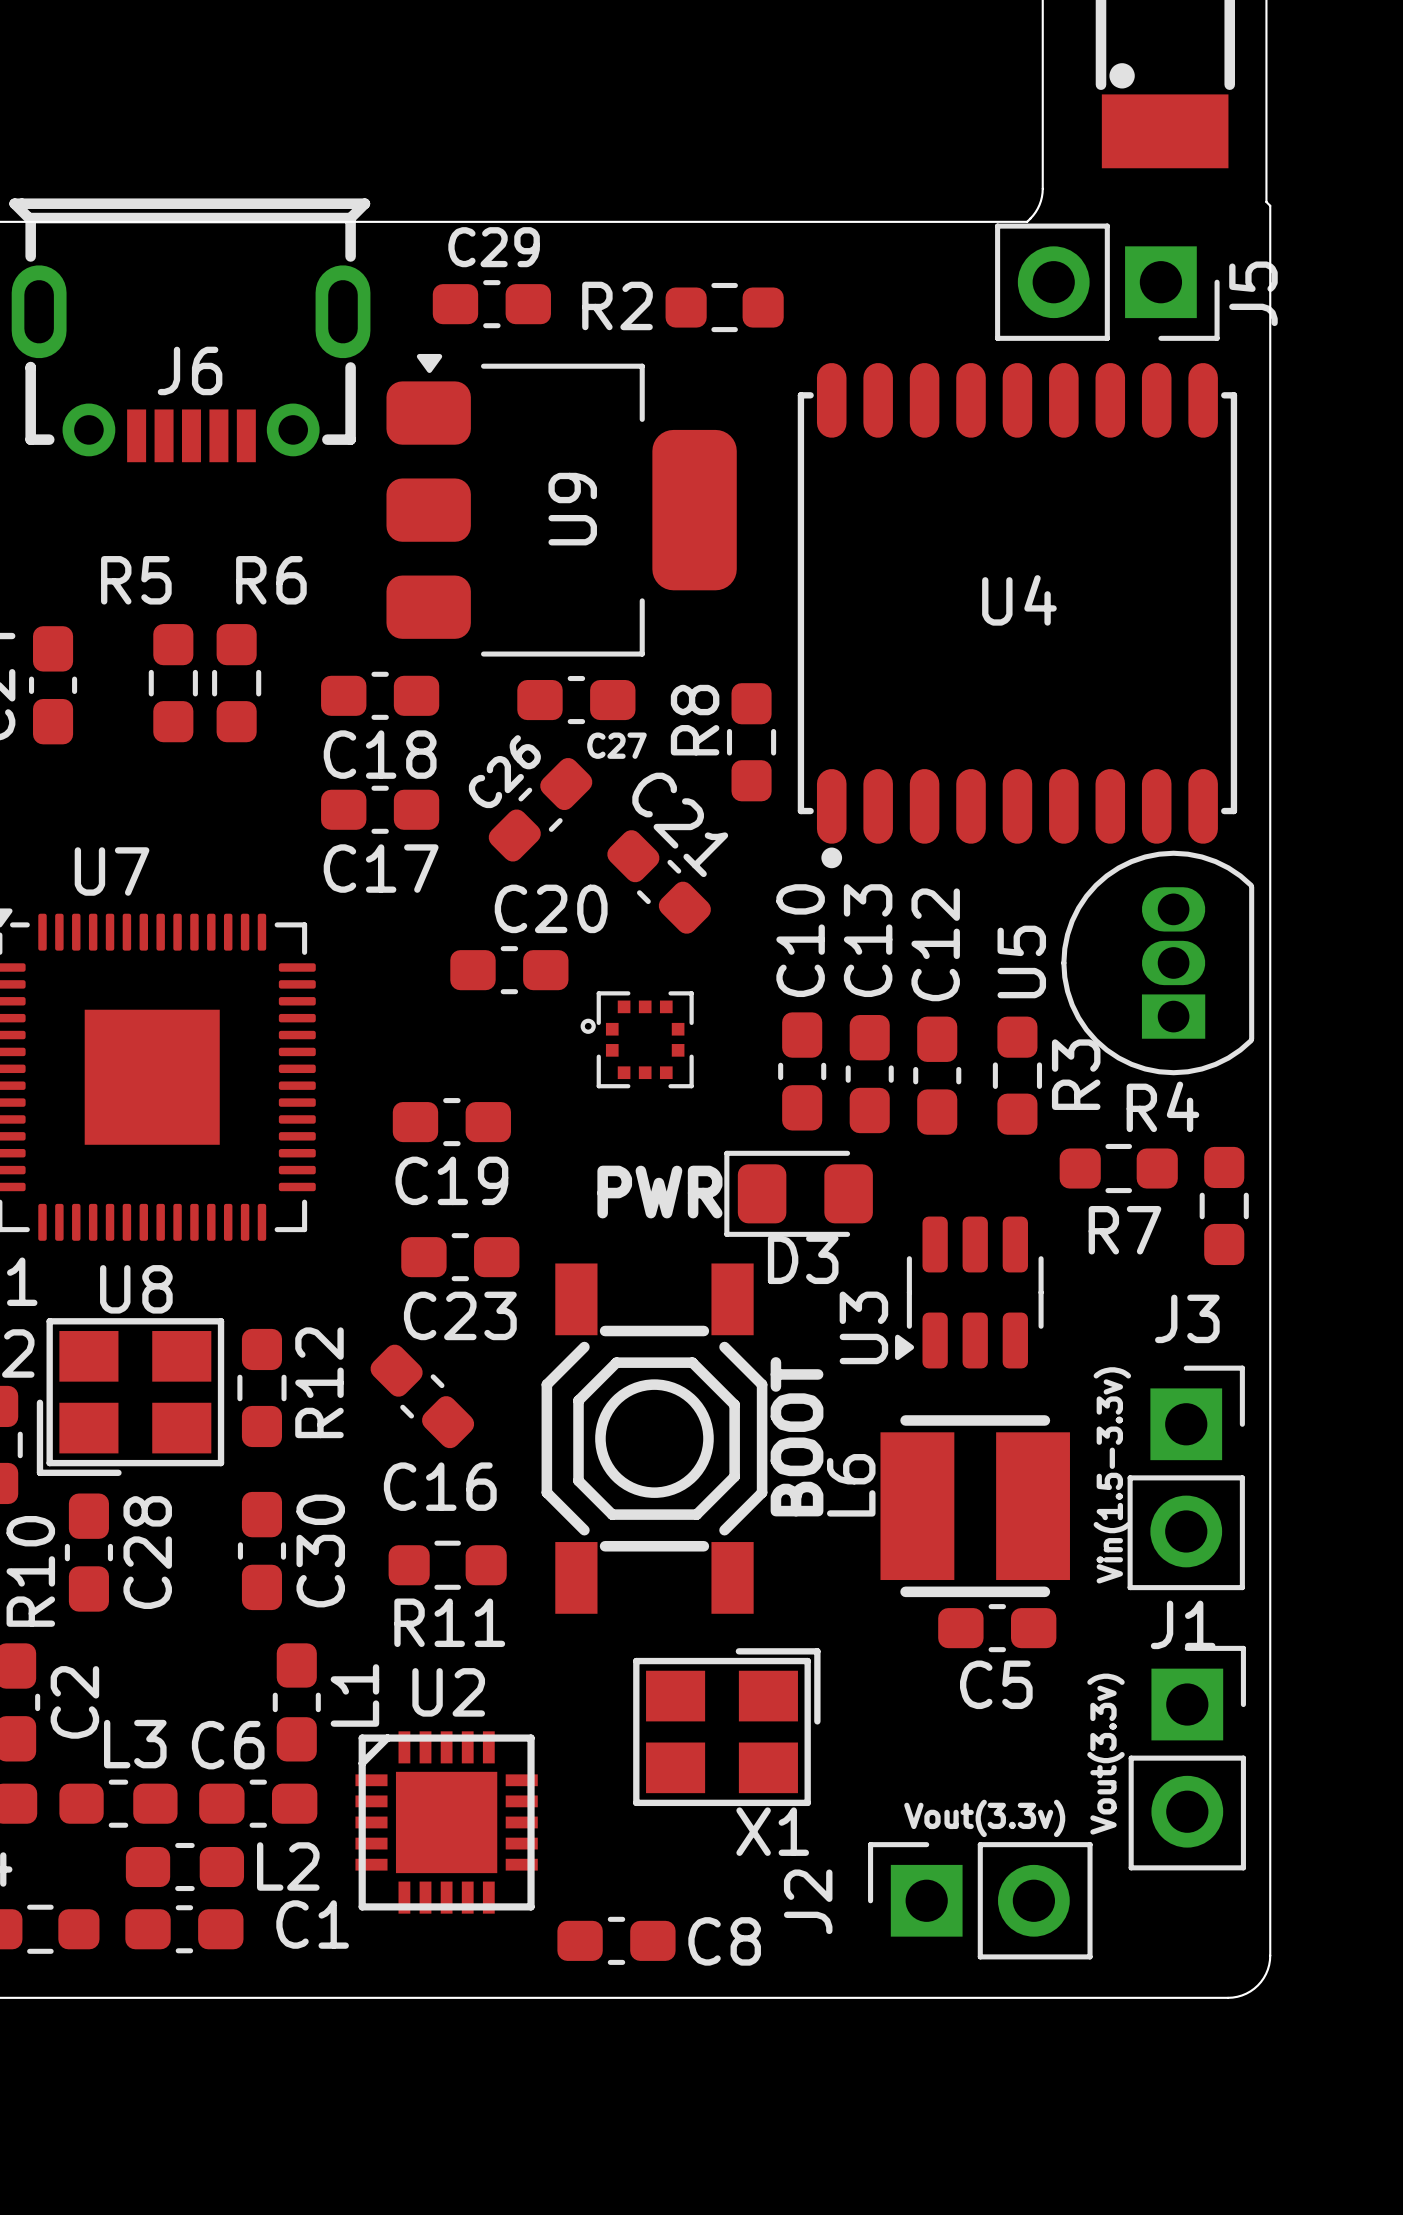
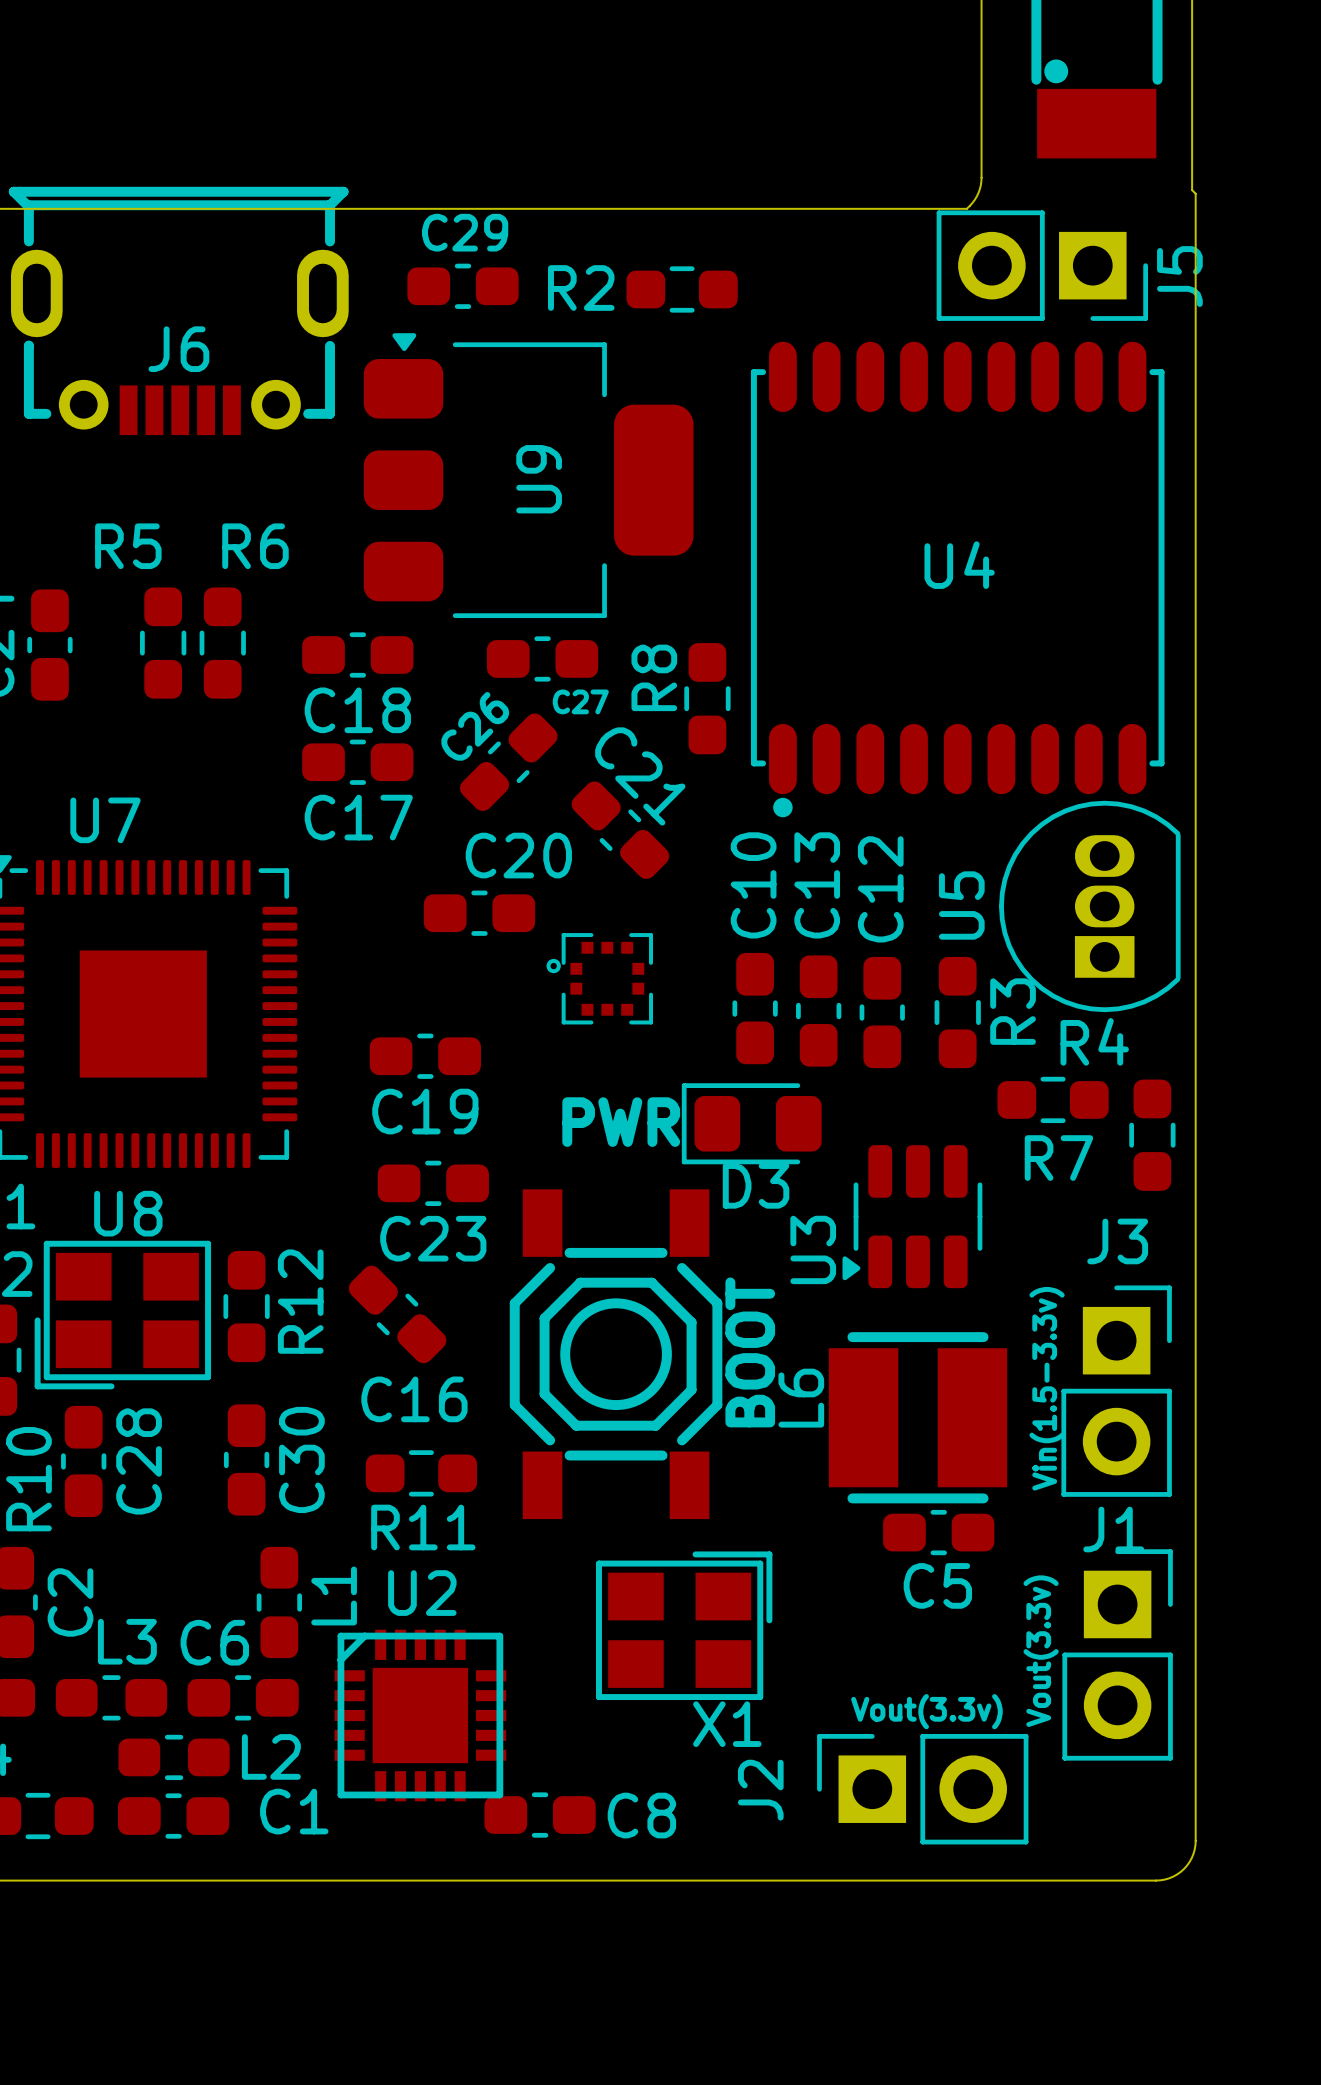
C8 position: (616, 1940) -> (540, 1815)

